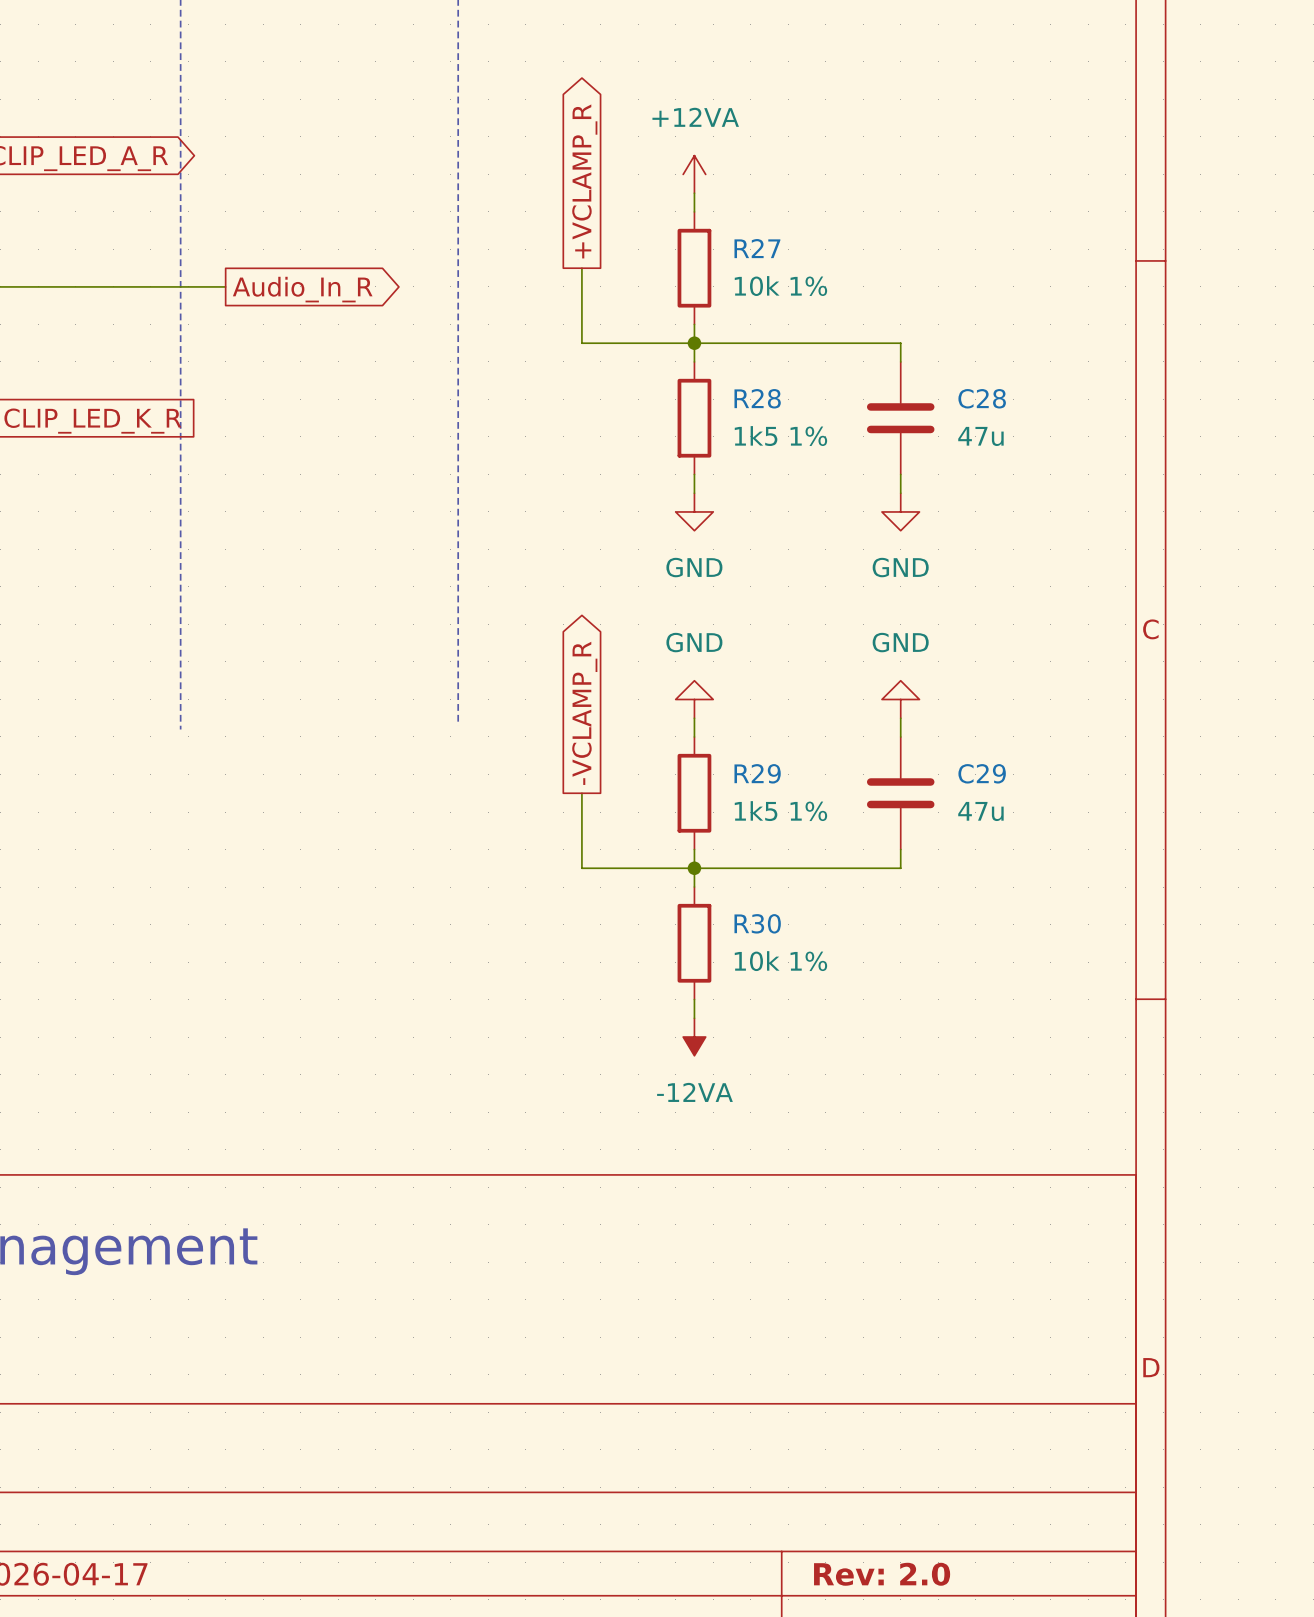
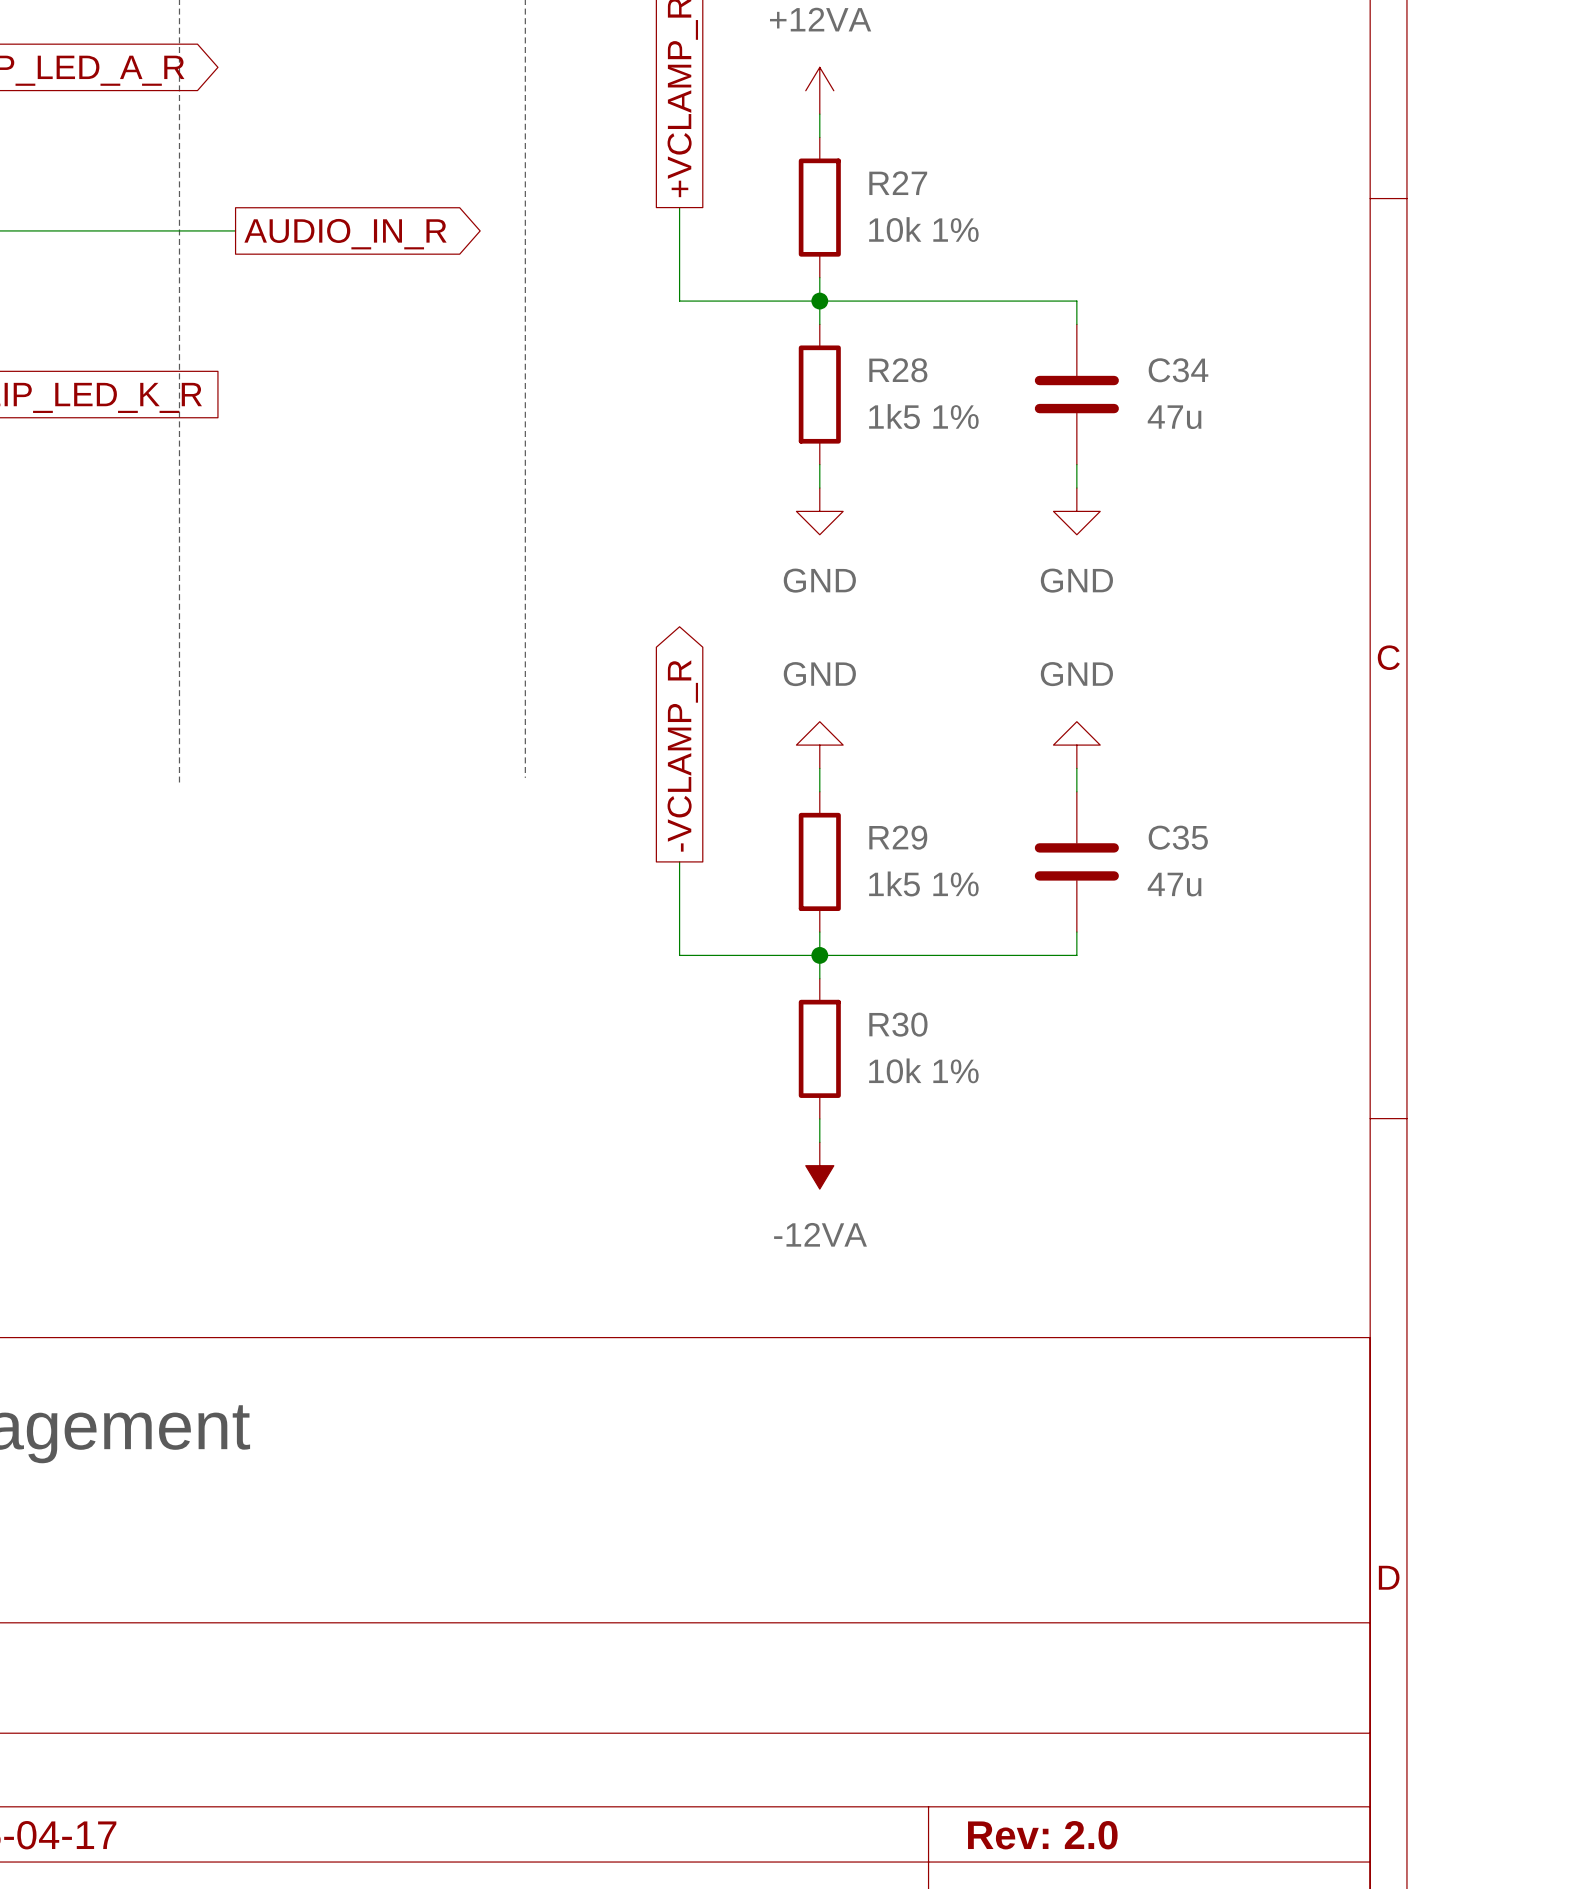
global label: Audio_In_R (302, 289) -> AUDIO_IN_R (345, 234)
C28 name: C28 (982, 398) -> C34 (1178, 370)
C29 name: C29 (982, 773) -> C35 (1178, 837)

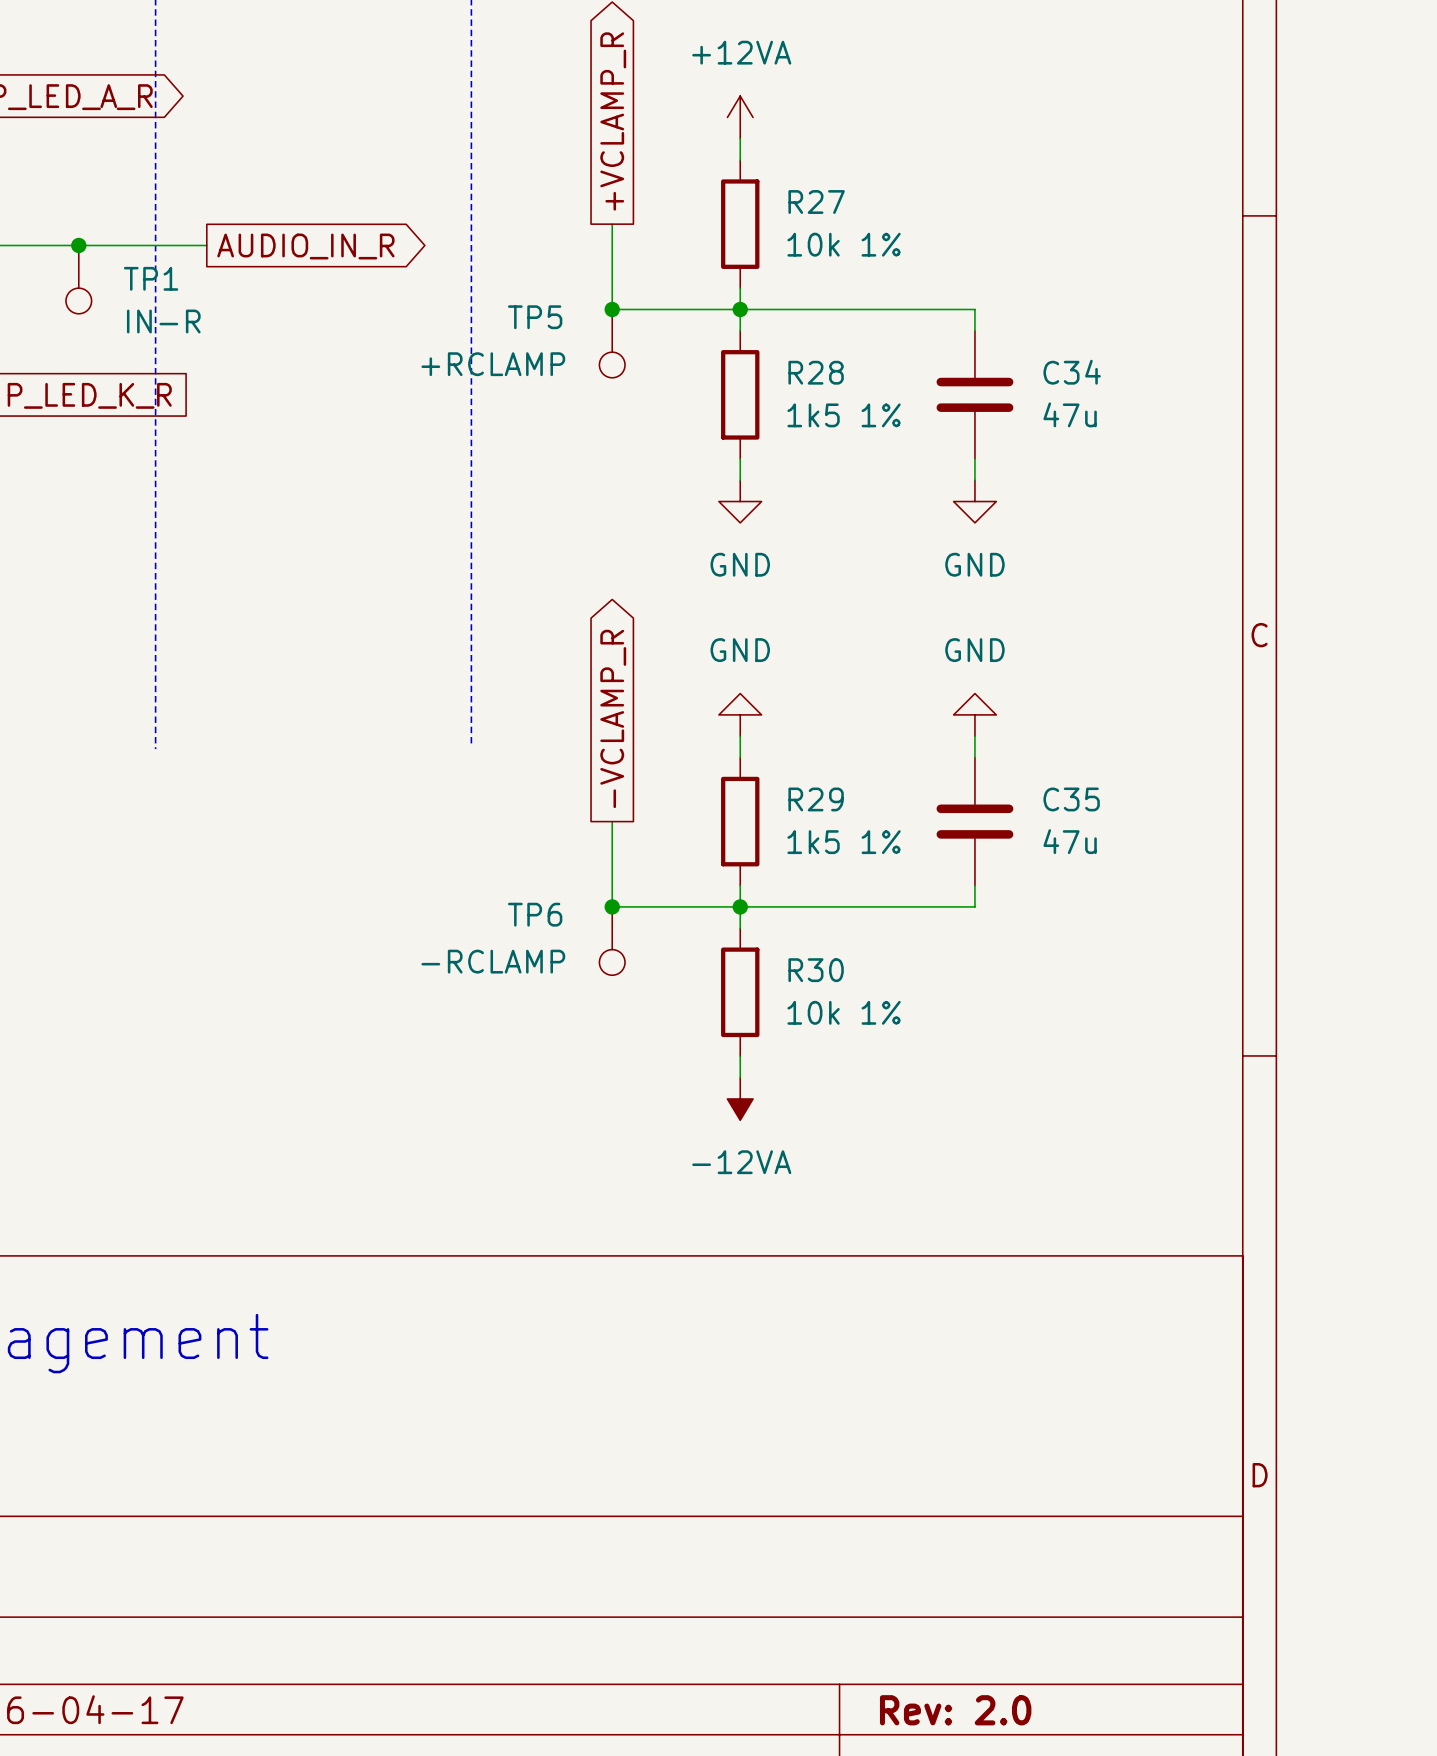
junction: none -> (78, 245)
TP1: none -> IN-R (78, 279)
junction: none -> (612, 309)
TP5: none -> +RCLAMP (612, 343)
junction: none -> (612, 906)
TP6: none -> -RCLAMP (612, 941)

